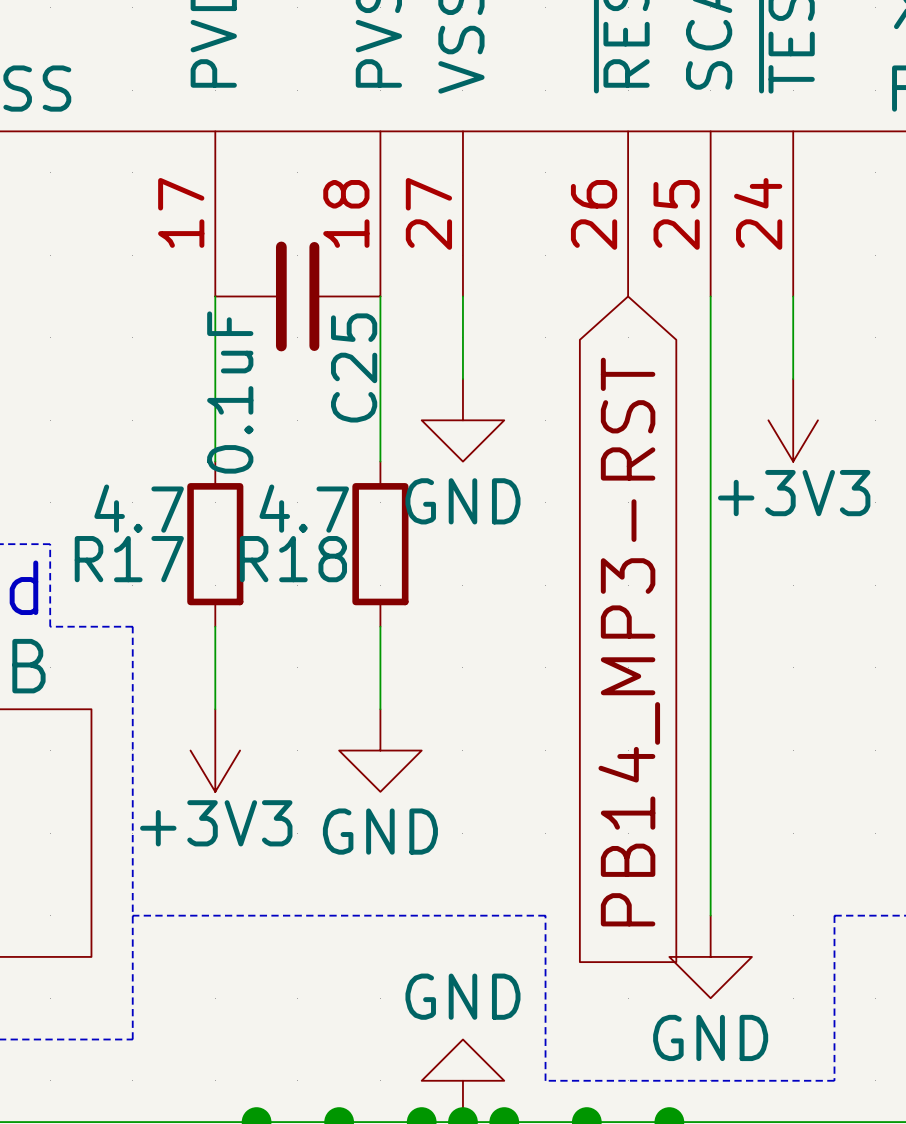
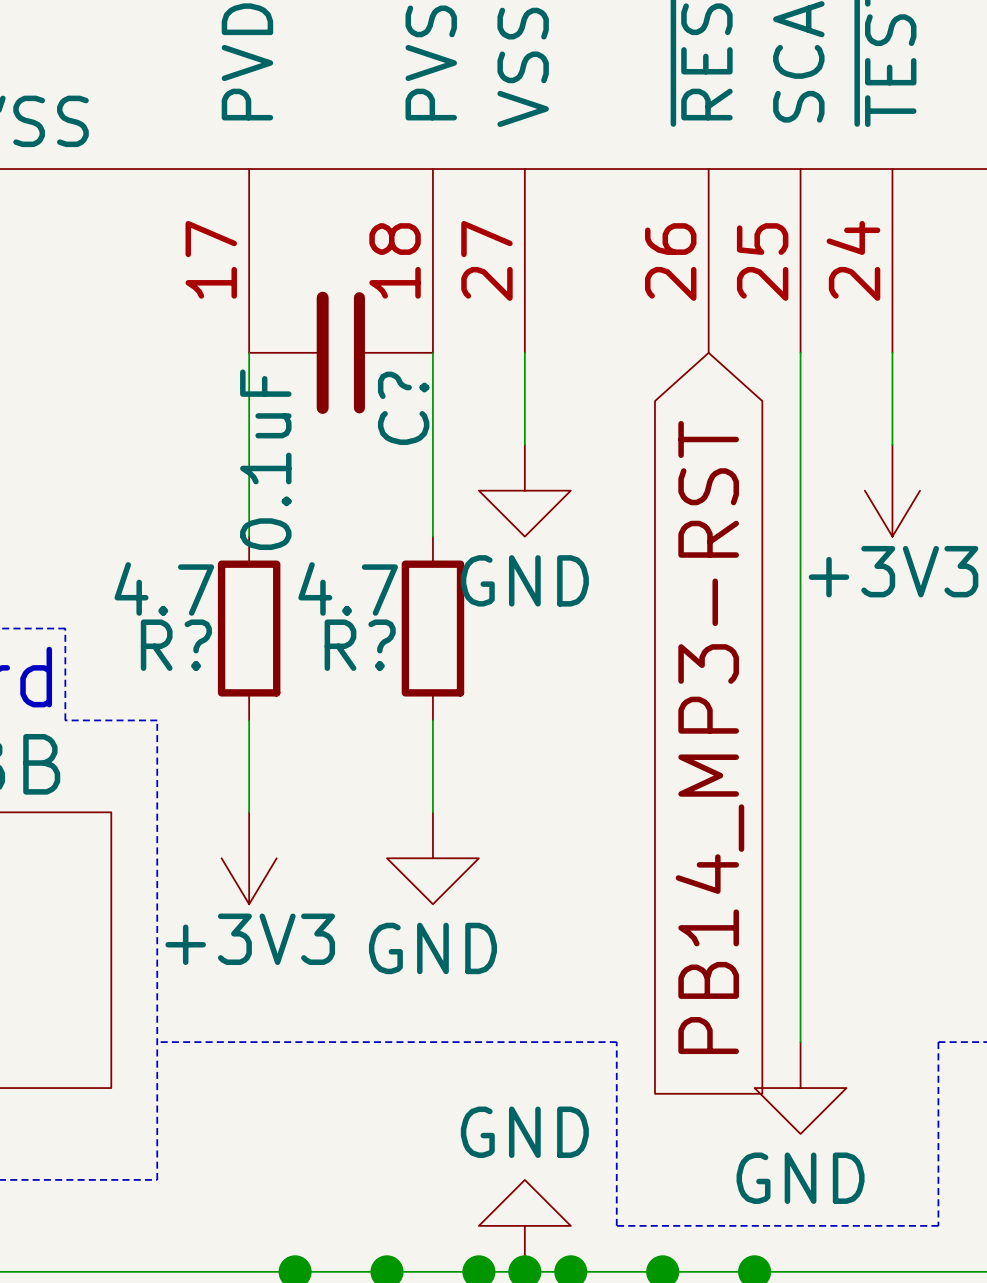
C25 name: C25 (354, 367) -> C? (403, 408)
R17 name: R17 (129, 559) -> R? (176, 645)
R18 name: R18 (293, 559) -> R? (360, 645)

